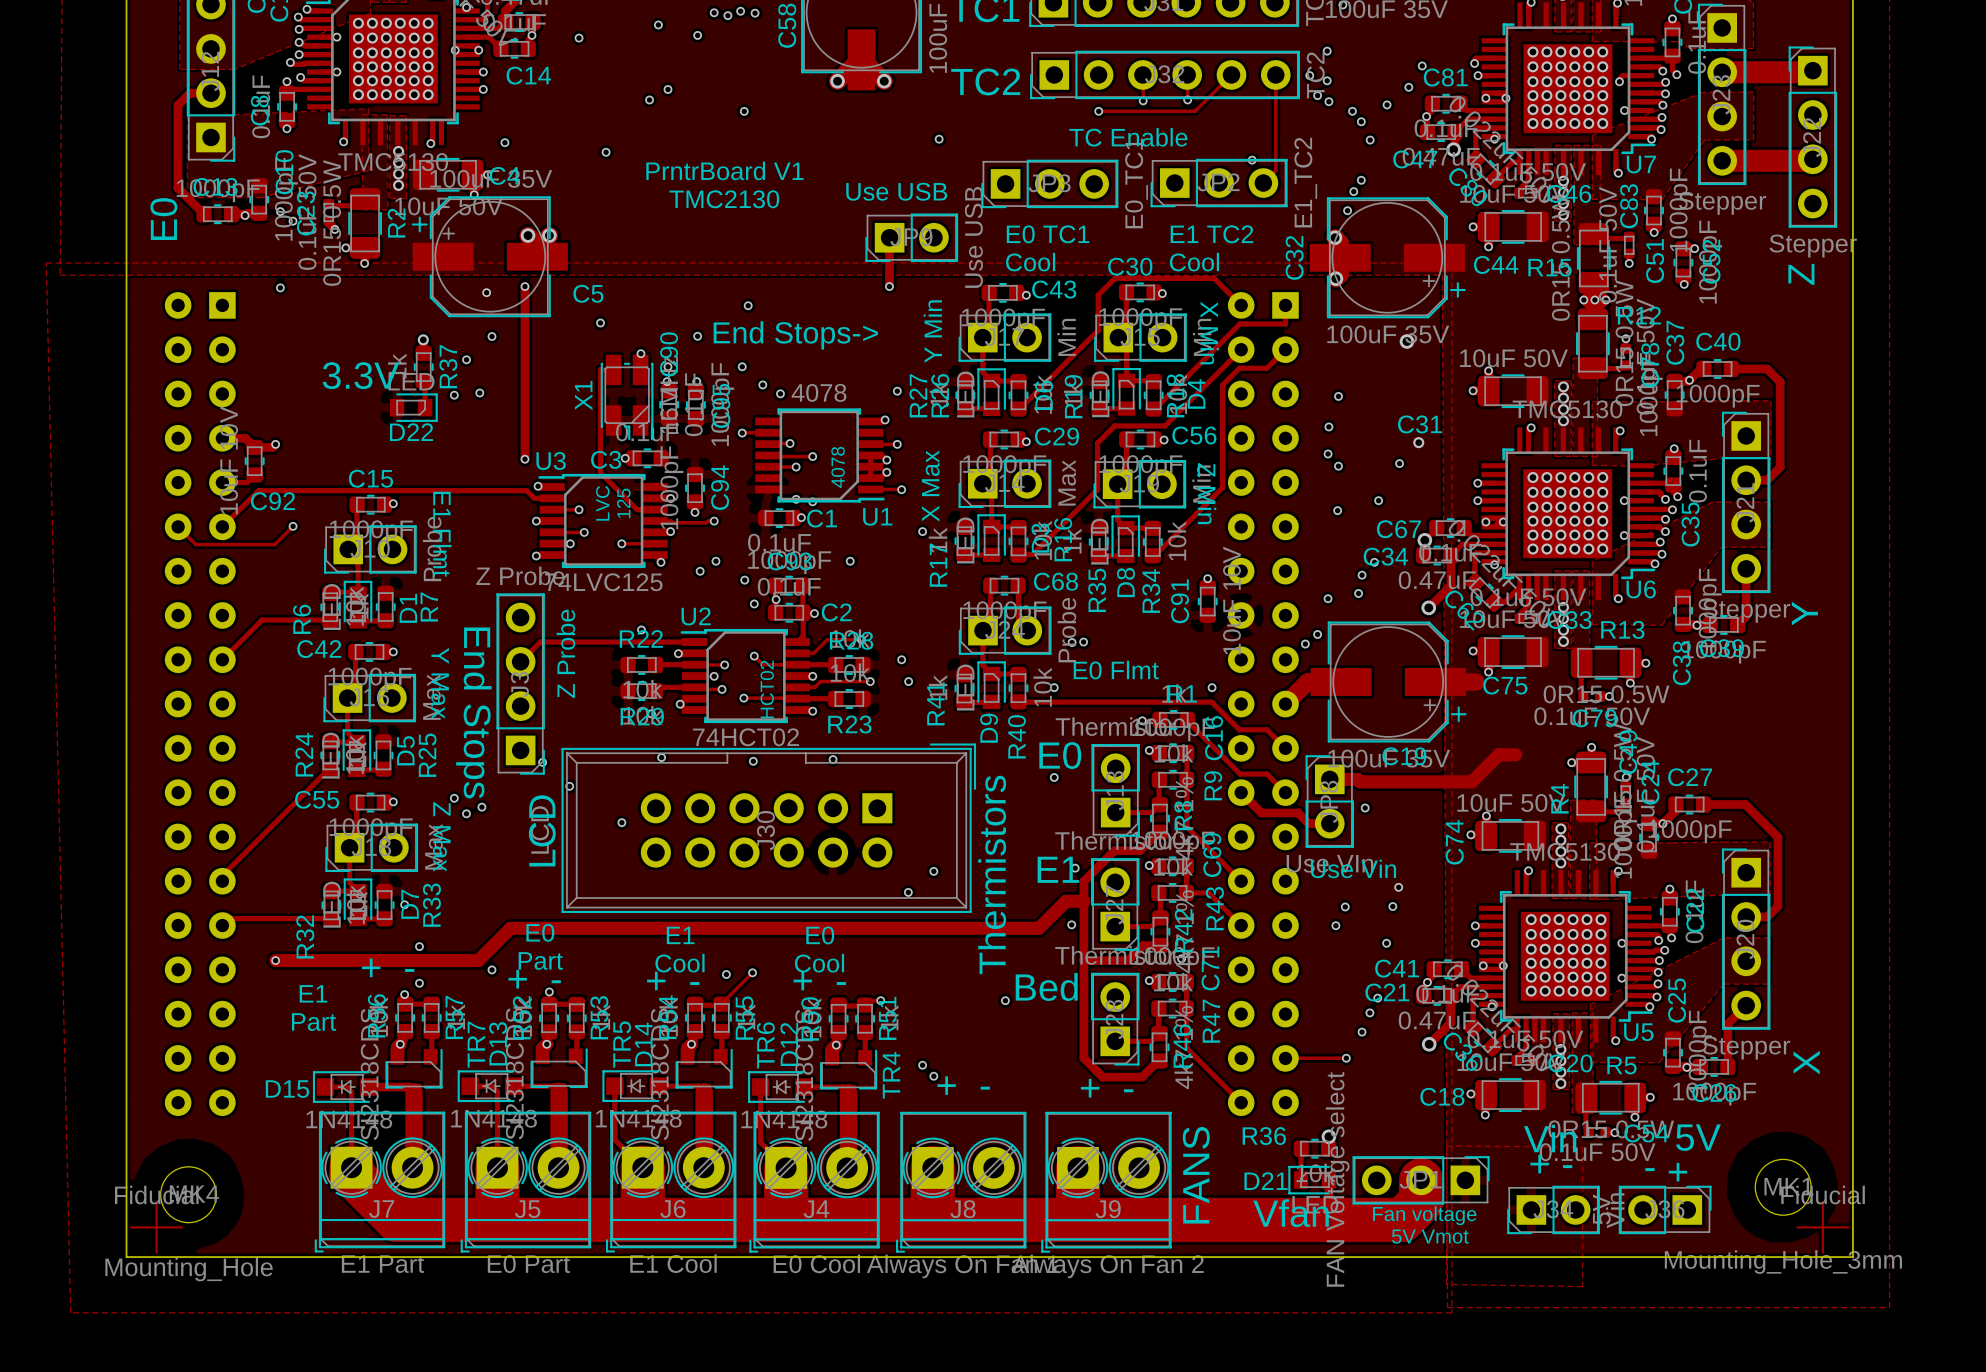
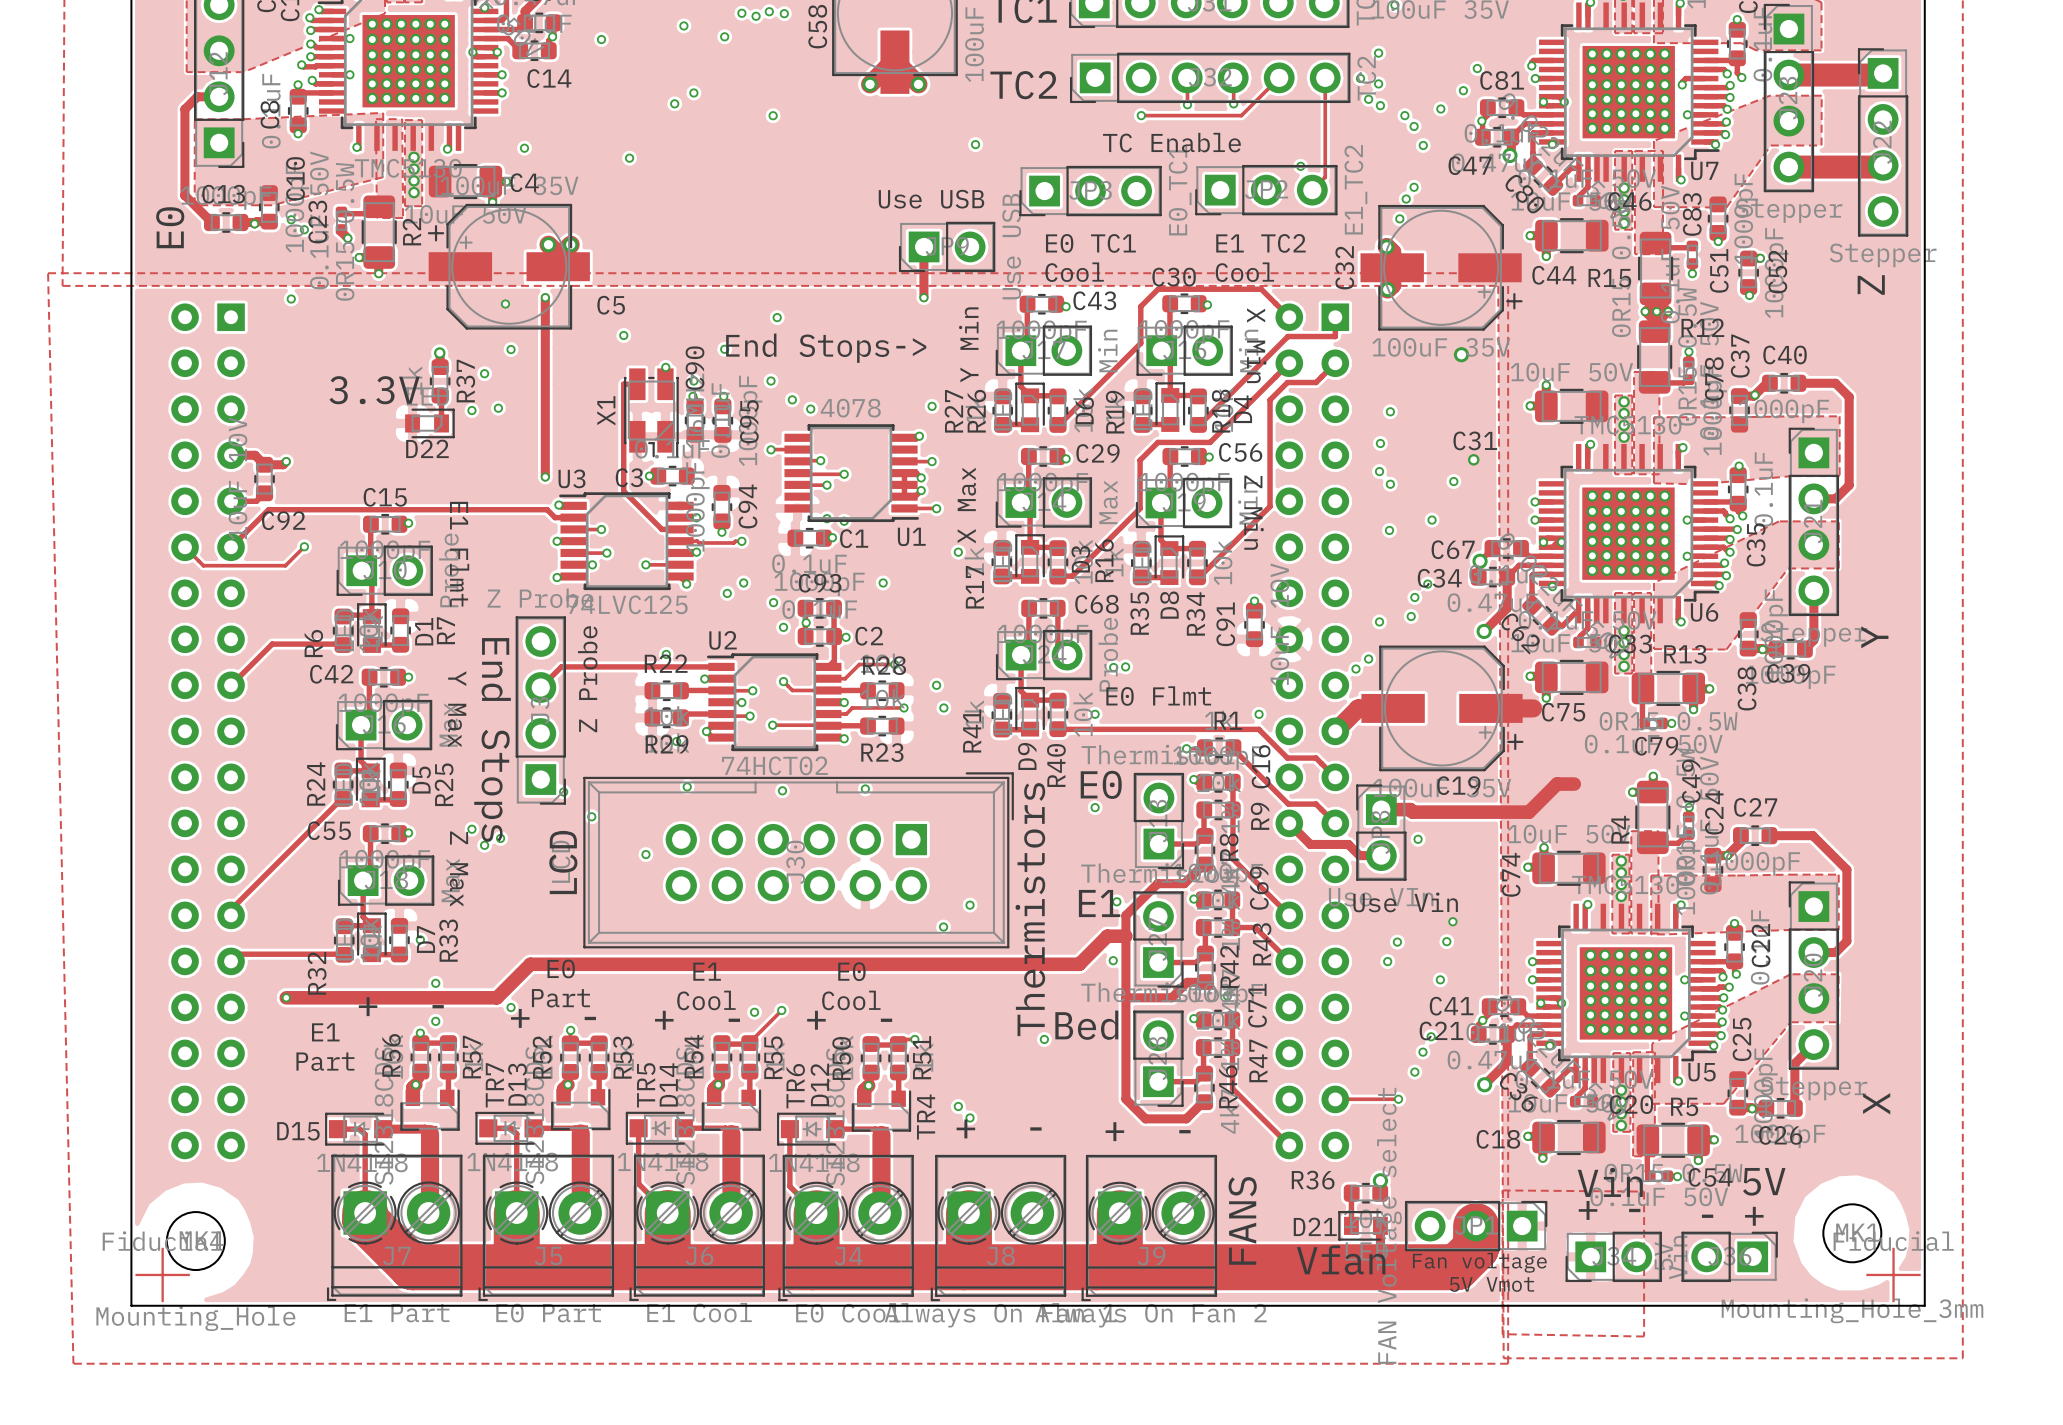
text: PrntrBoard V1 (724, 170) -> none
text: TMC2130 (724, 199) -> none
text: 4078 (838, 467) -> none
text: LVC (602, 503) -> none
text: 125 (623, 503) -> none
text: HCT02 (767, 689) -> none

